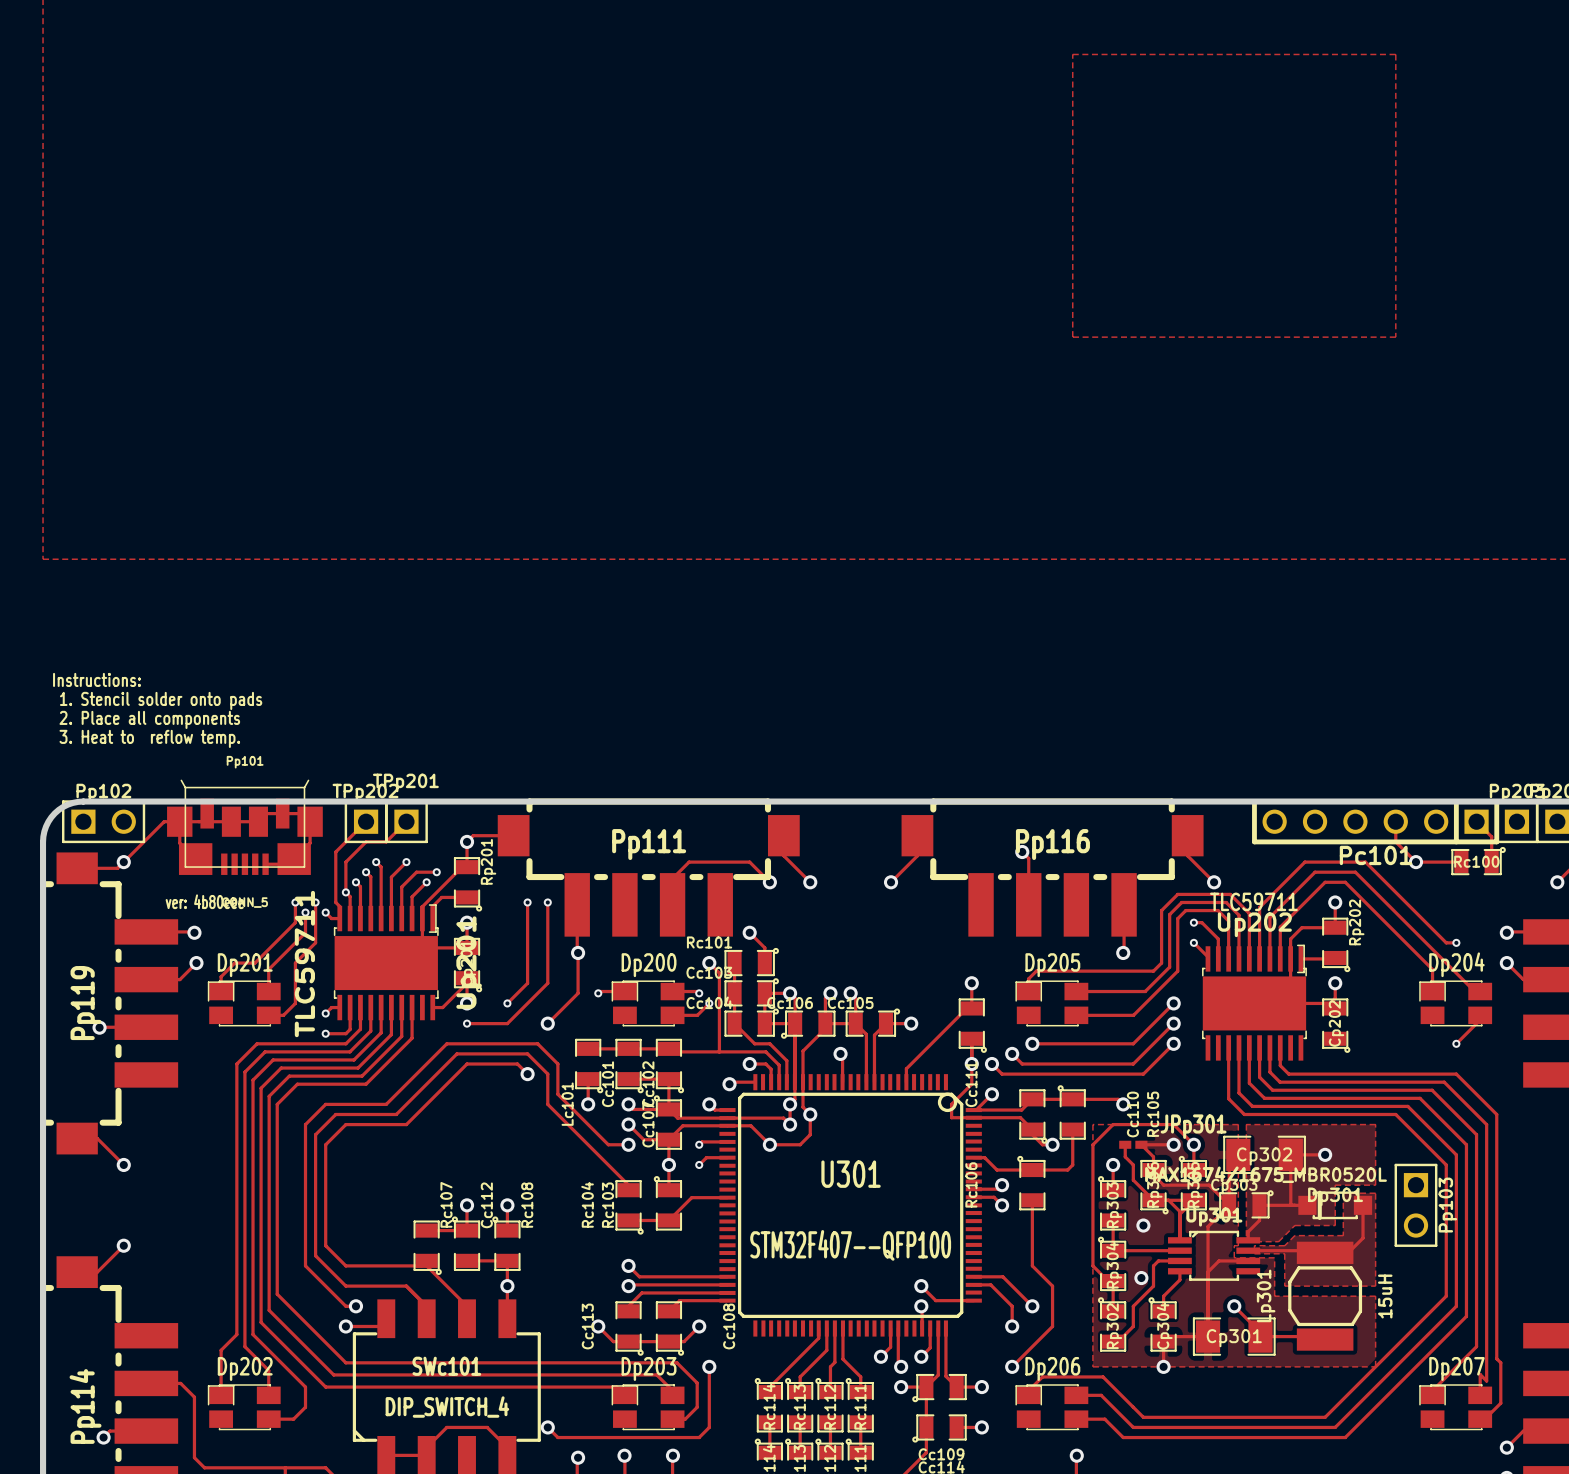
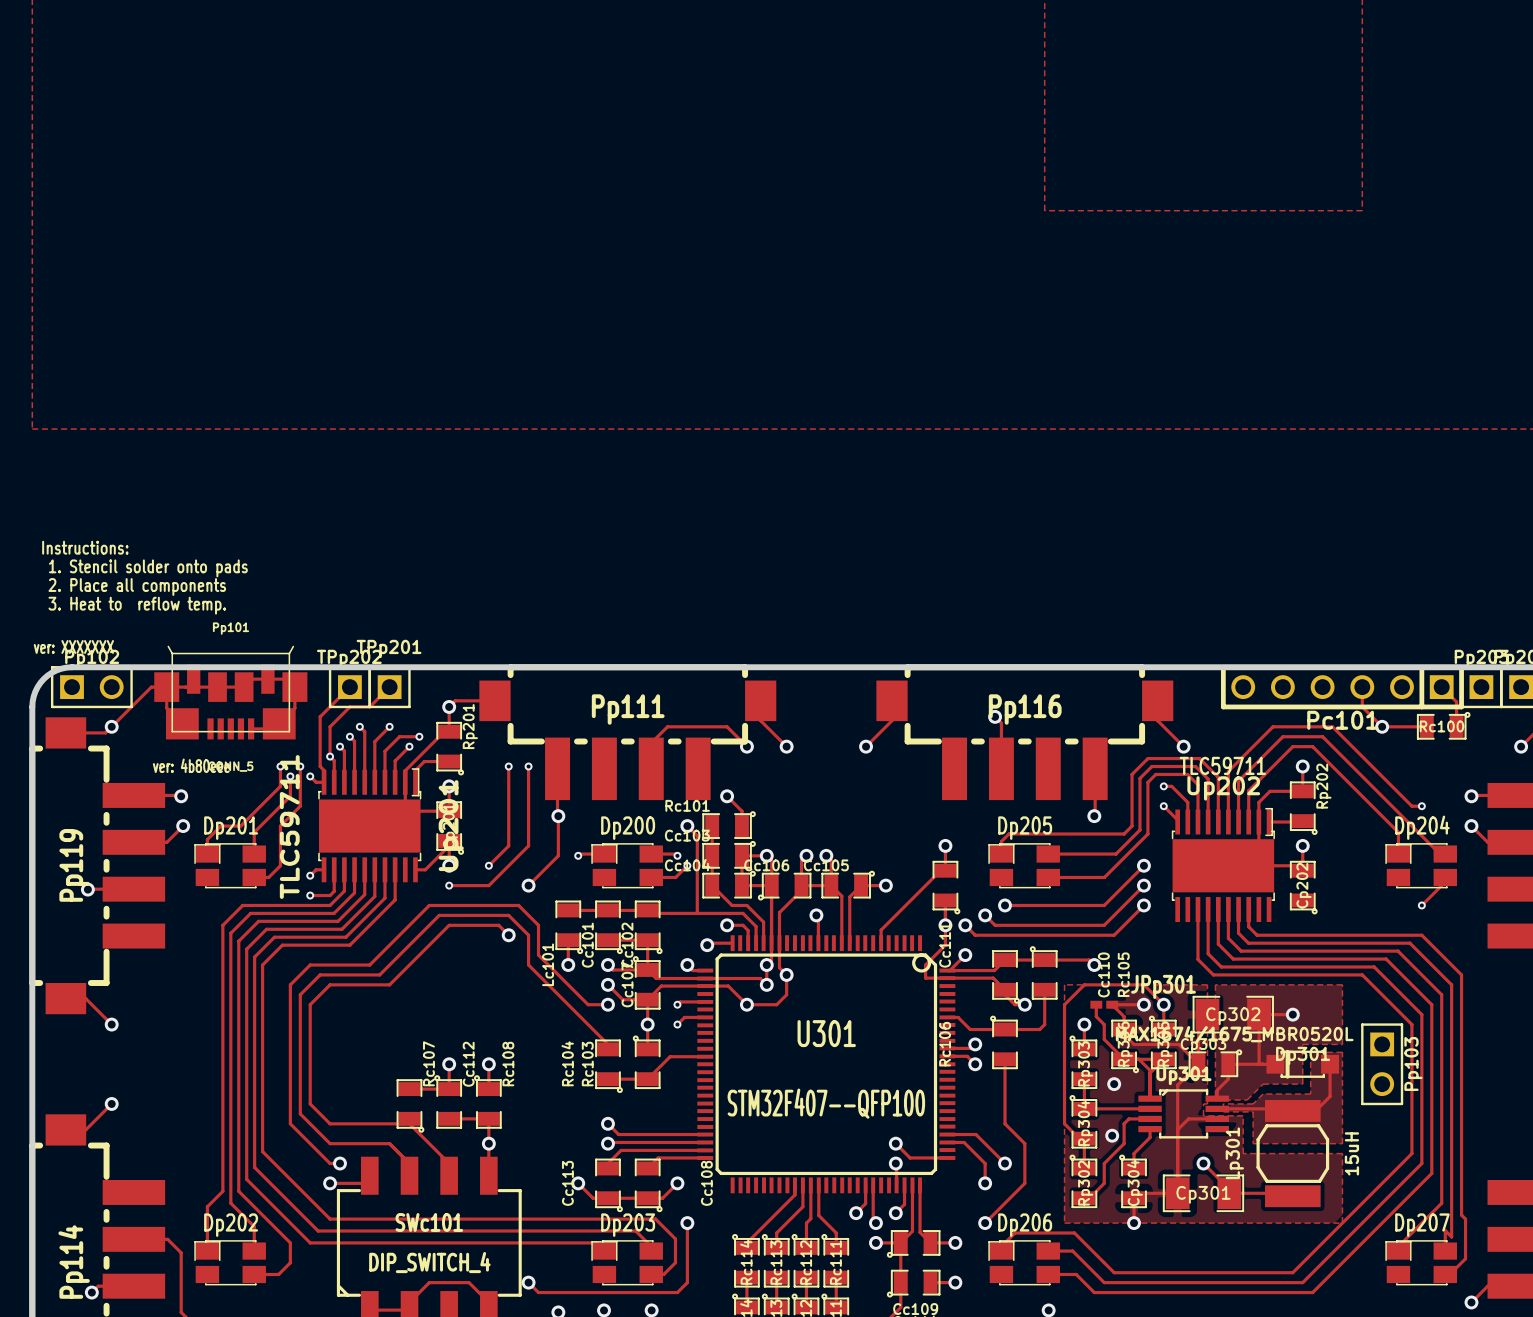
text: none -> ver: XXXXXXX (73, 646)

